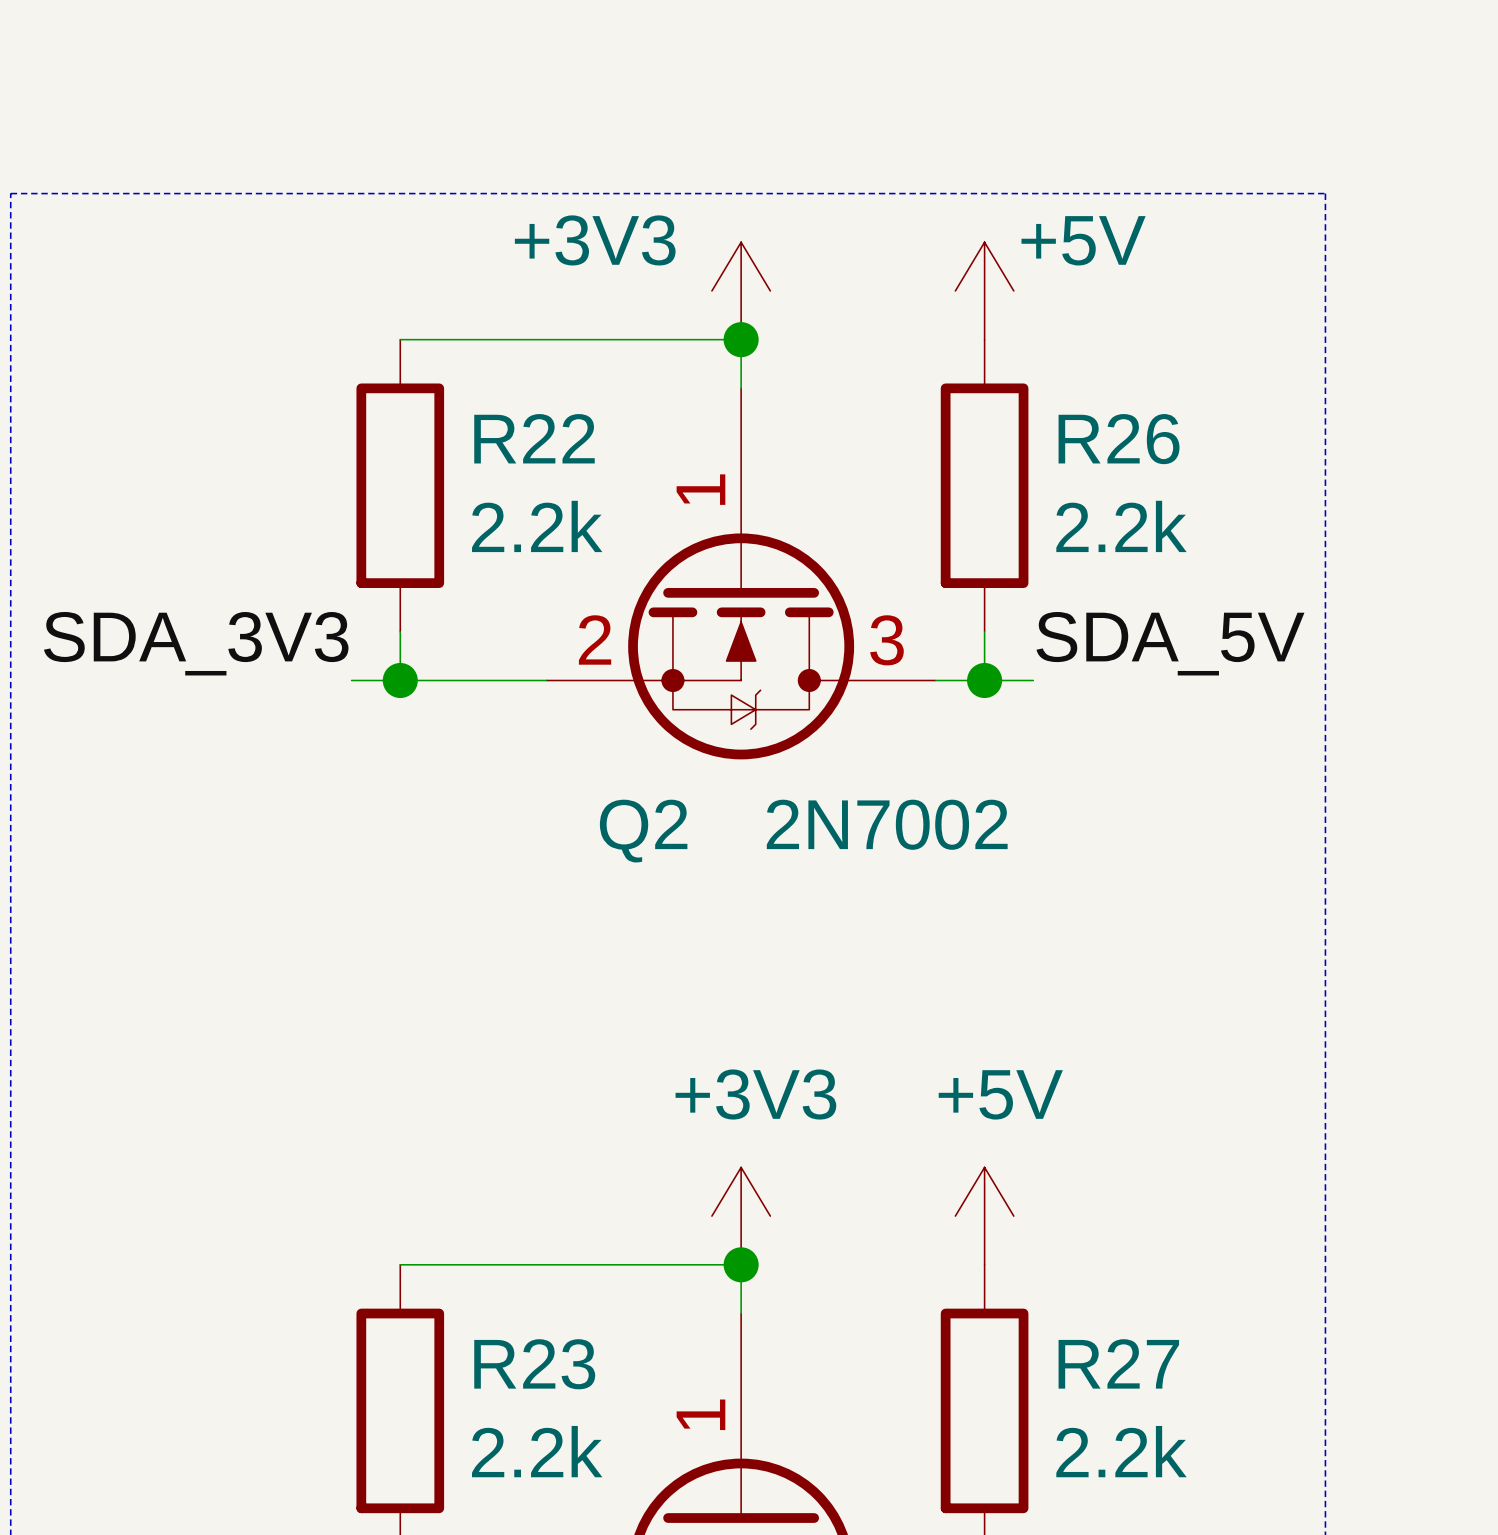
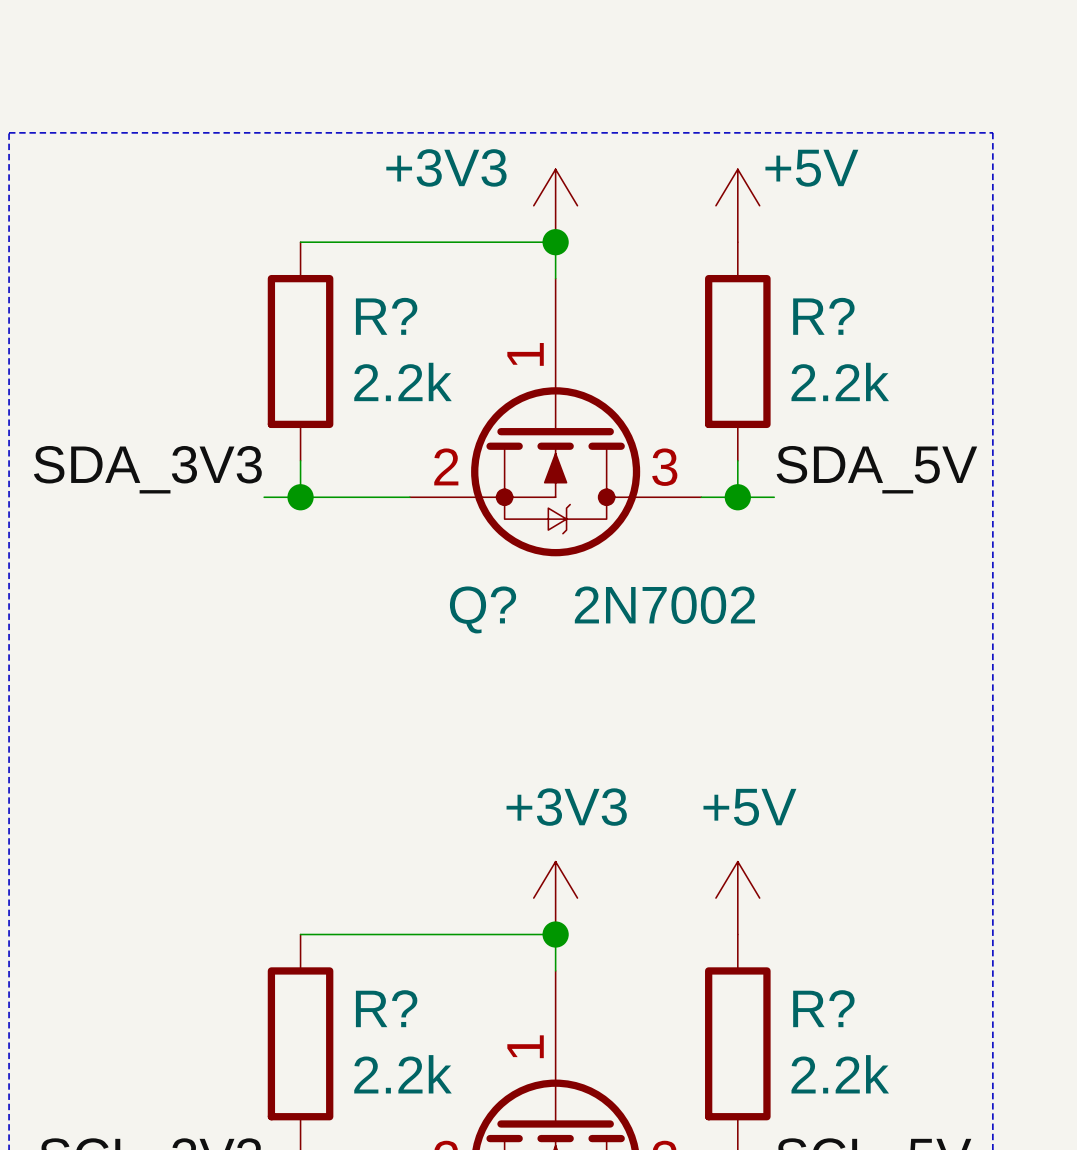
R22 name: R22 (534, 438) -> R? (386, 316)
R26 name: R26 (1119, 439) -> R? (823, 316)
Q2 name: Q2 (643, 831) -> Q? (483, 609)
R27 name: R27 (1118, 1363) -> R? (823, 1008)
R23 name: R23 (534, 1364) -> R? (386, 1008)

